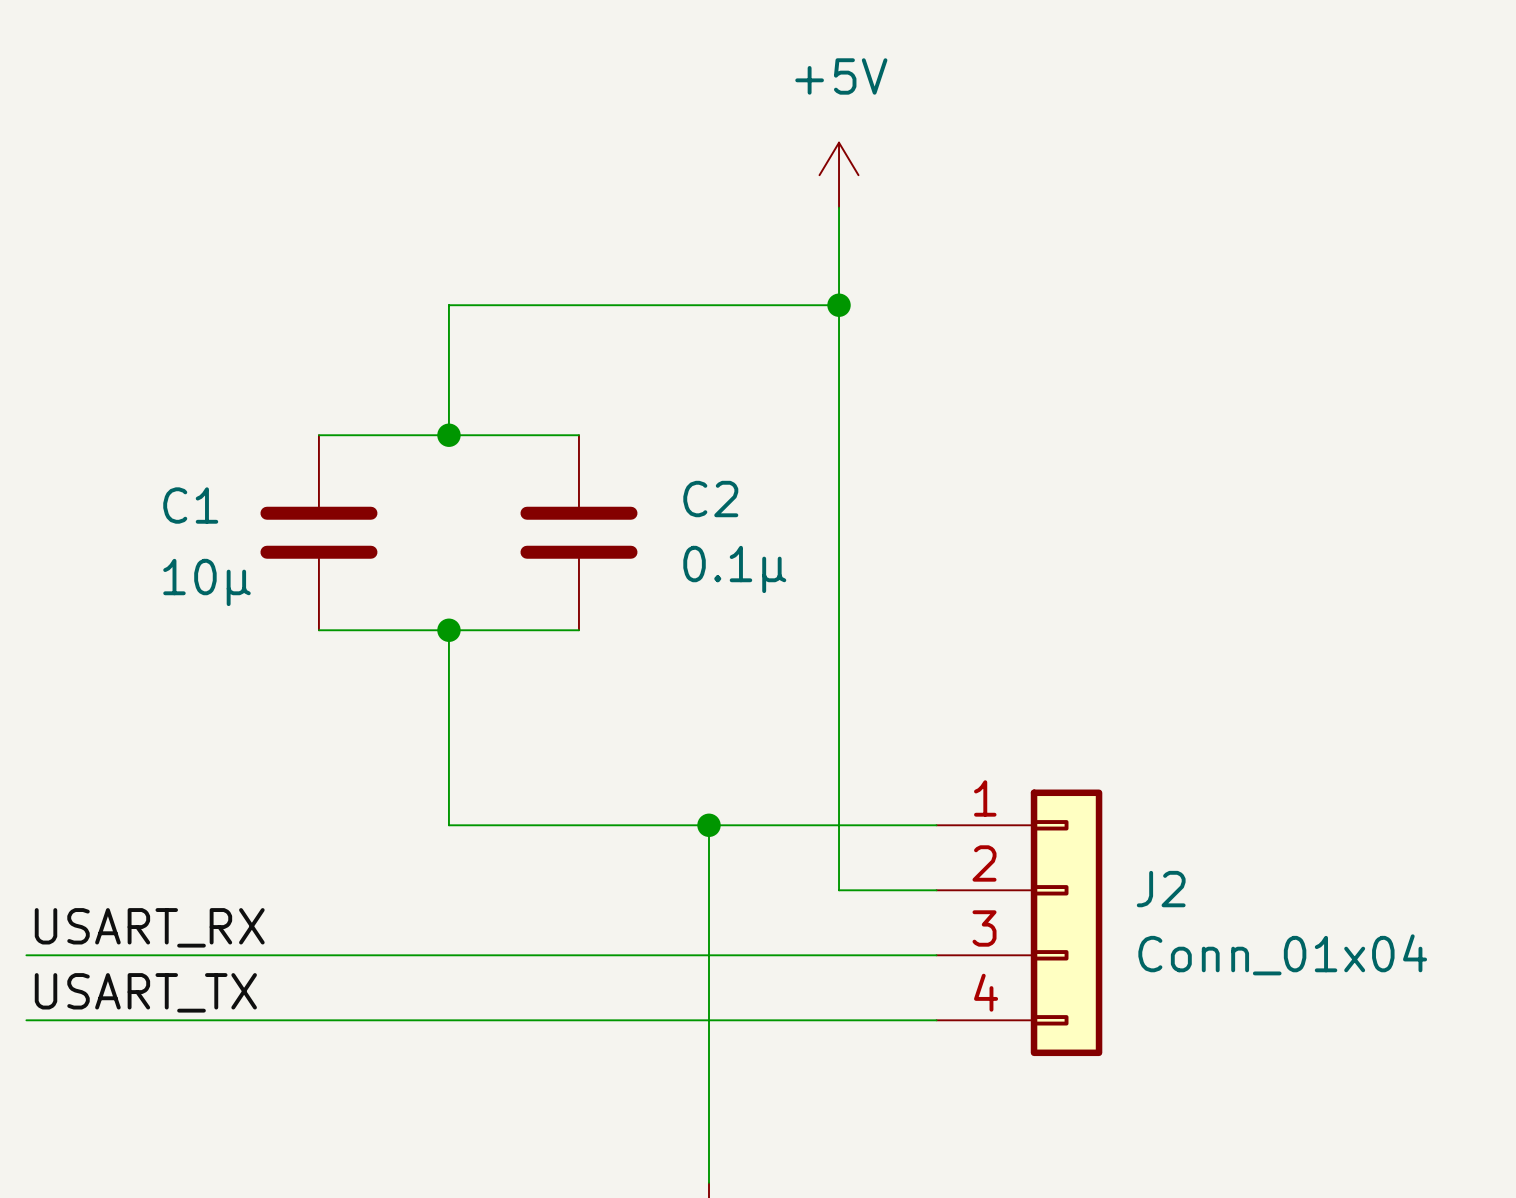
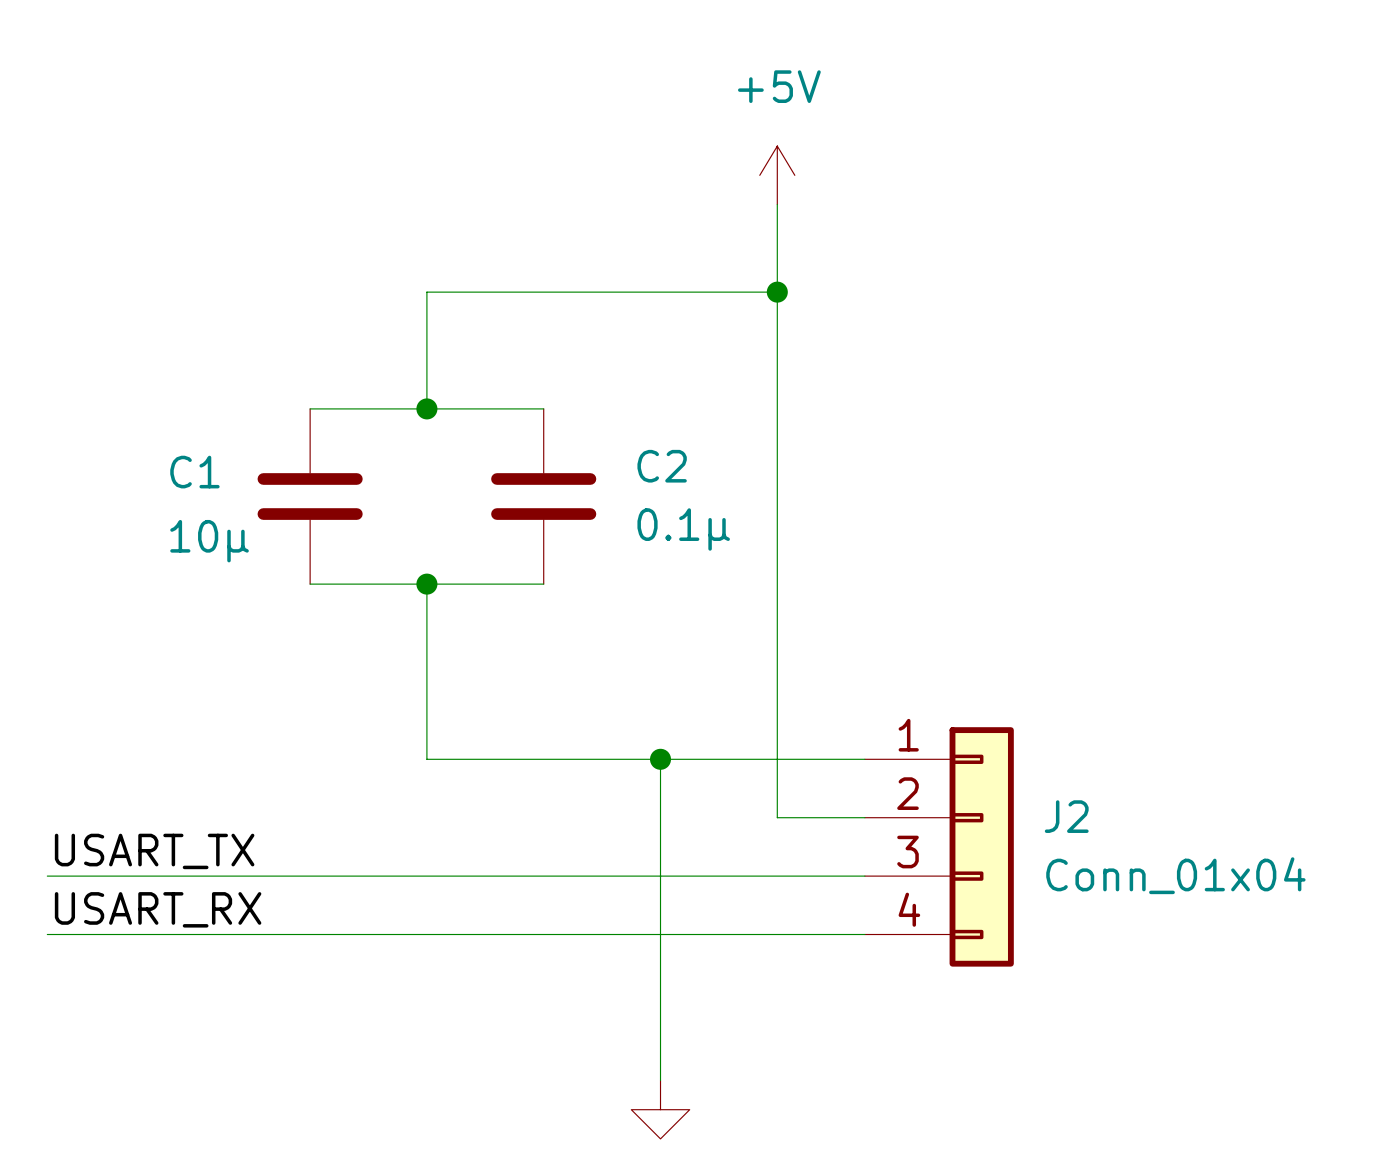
label: USART_RX (149, 927) -> USART_TX (154, 851)
label: USART_TX (145, 992) -> USART_RX (158, 909)

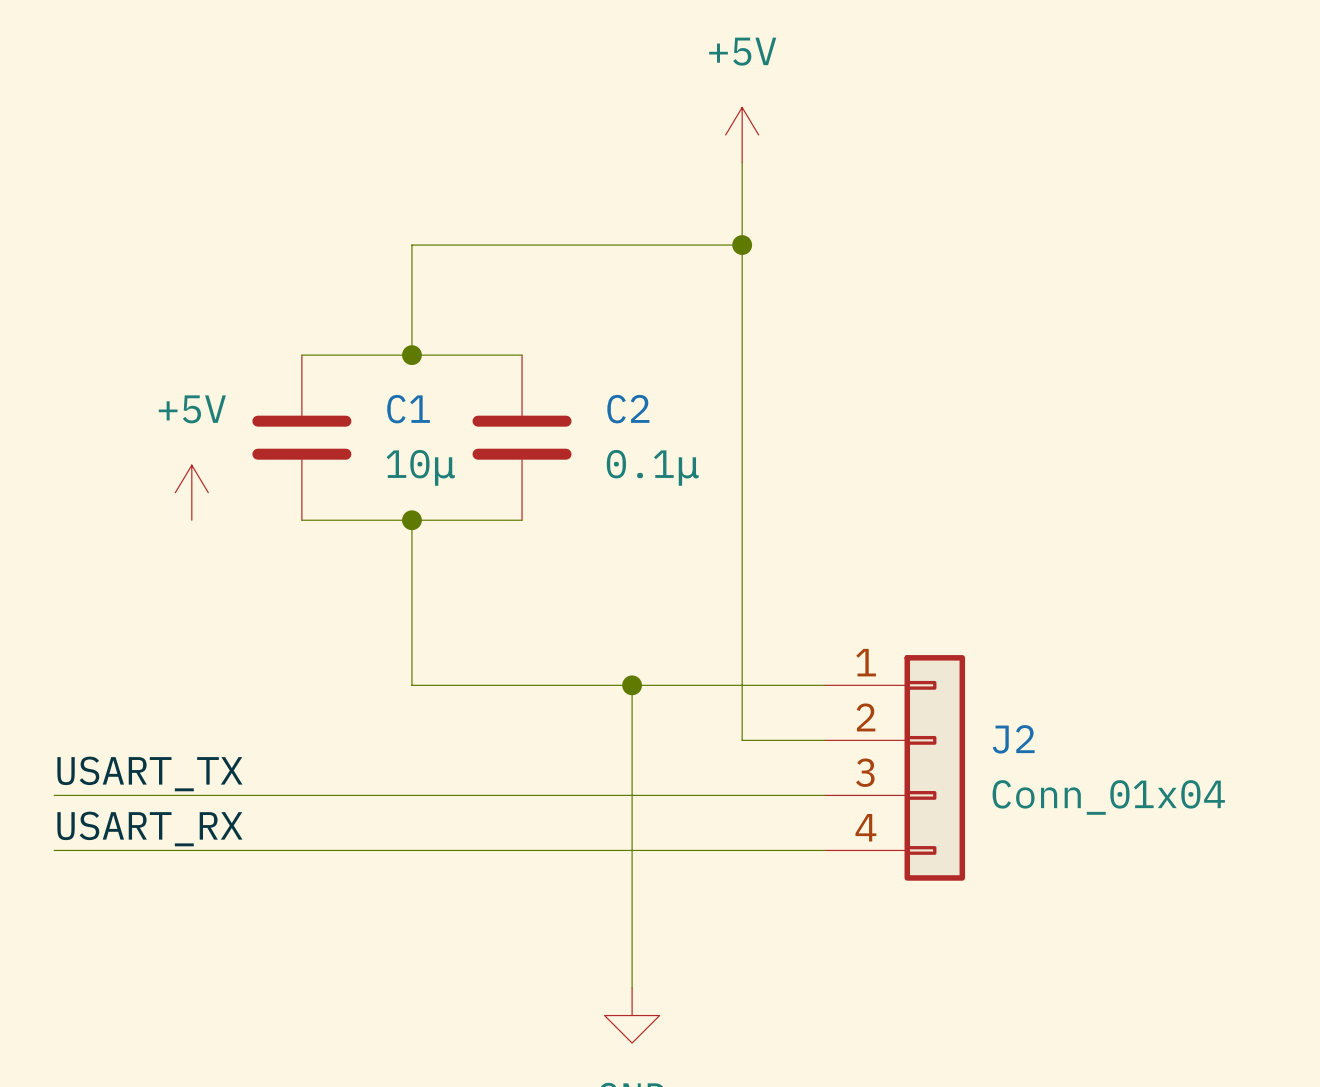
C1 name position: C1 (194, 472) -> C1 (408, 409)
C1 value position: 10μ (209, 541) -> 10μ (420, 467)
power symbol: none -> +5V (191, 492)

